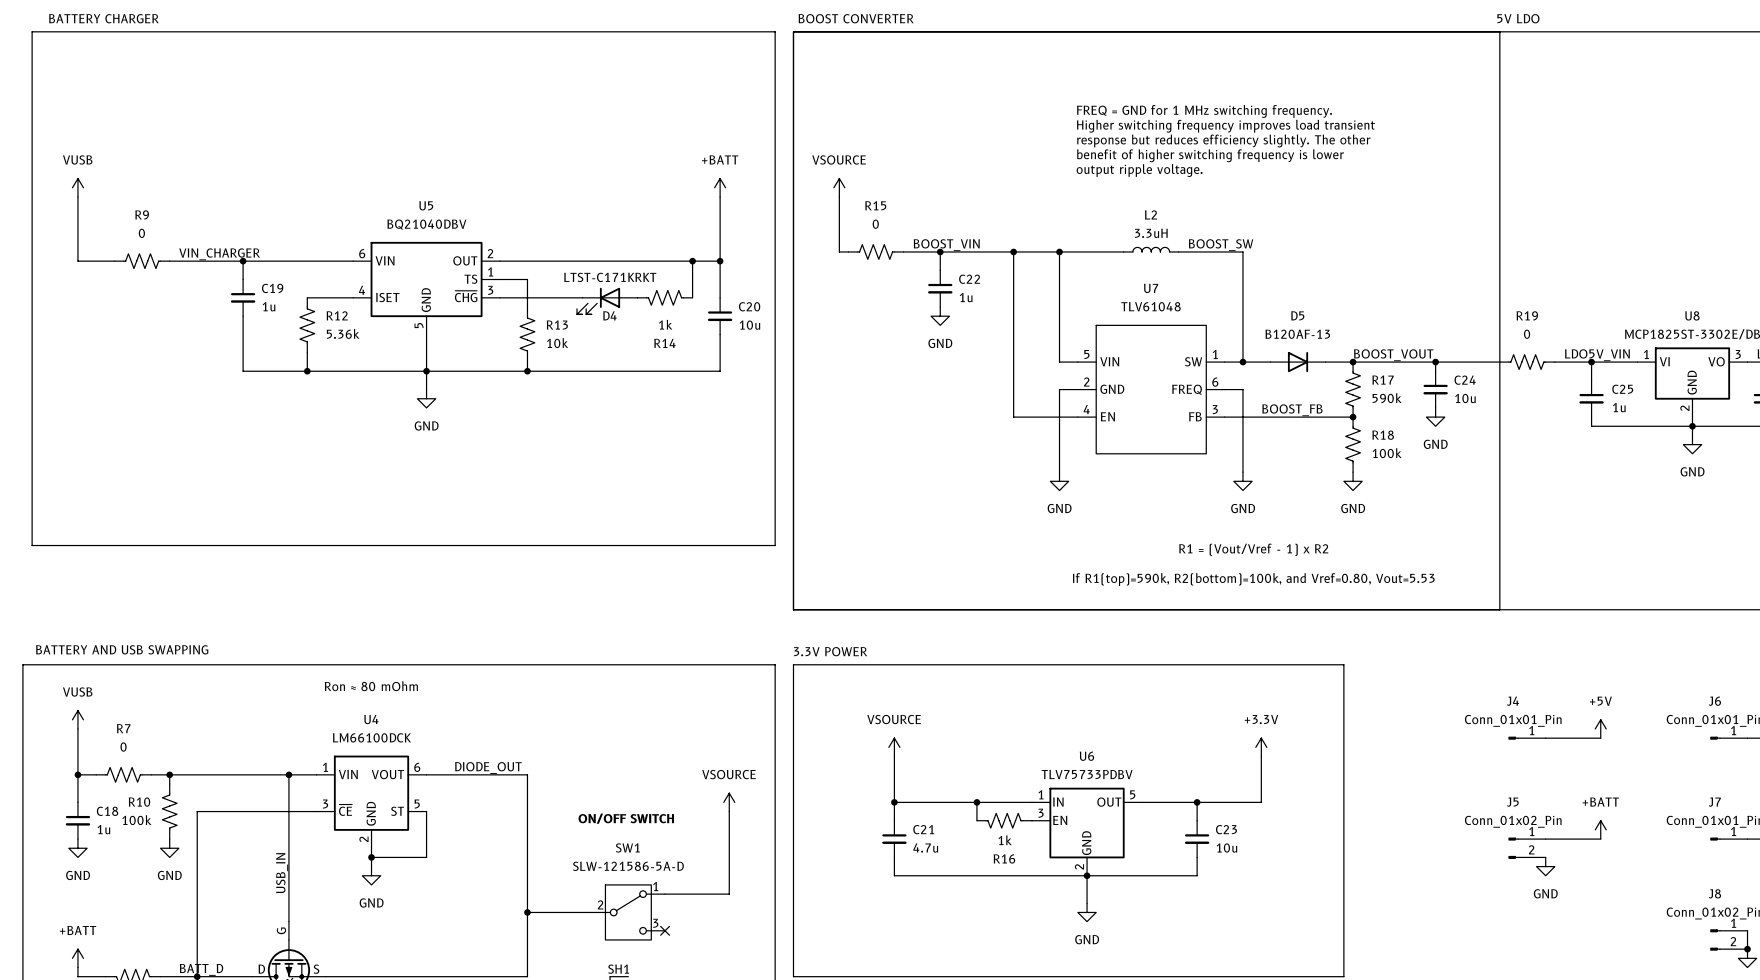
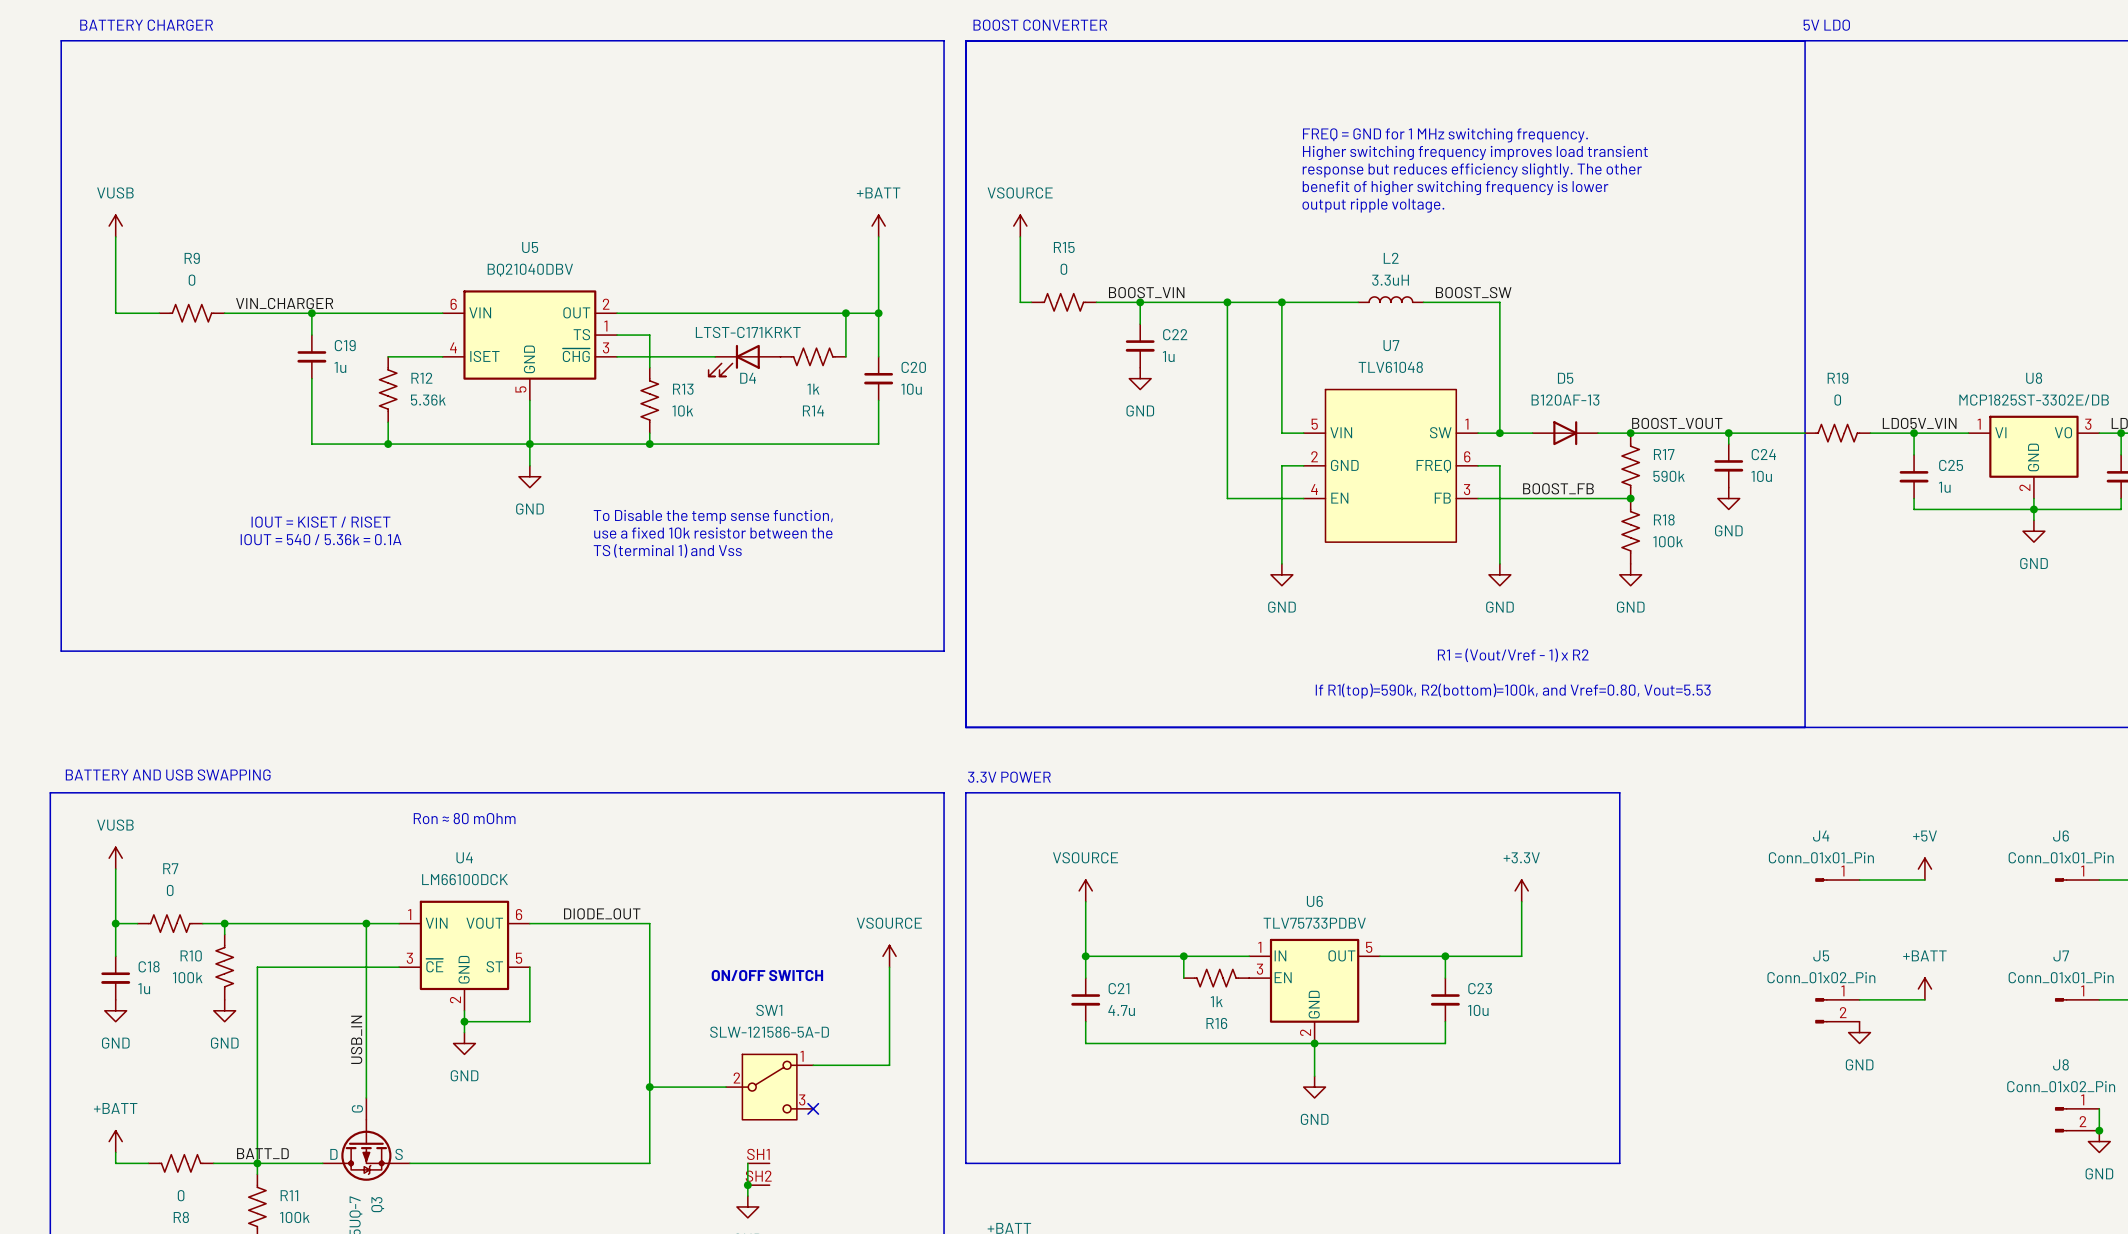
text: none -> To Disable the temp sense function, (713, 516)
text: none -> IOUT = KISET / RISET (321, 522)
text: none -> use a fixed 10k resistor between the (713, 533)
text: none -> IOUT = 540 / 5.36k = 0.1A (321, 539)
text: none -> TS (terminal 1) and Vss (667, 550)

